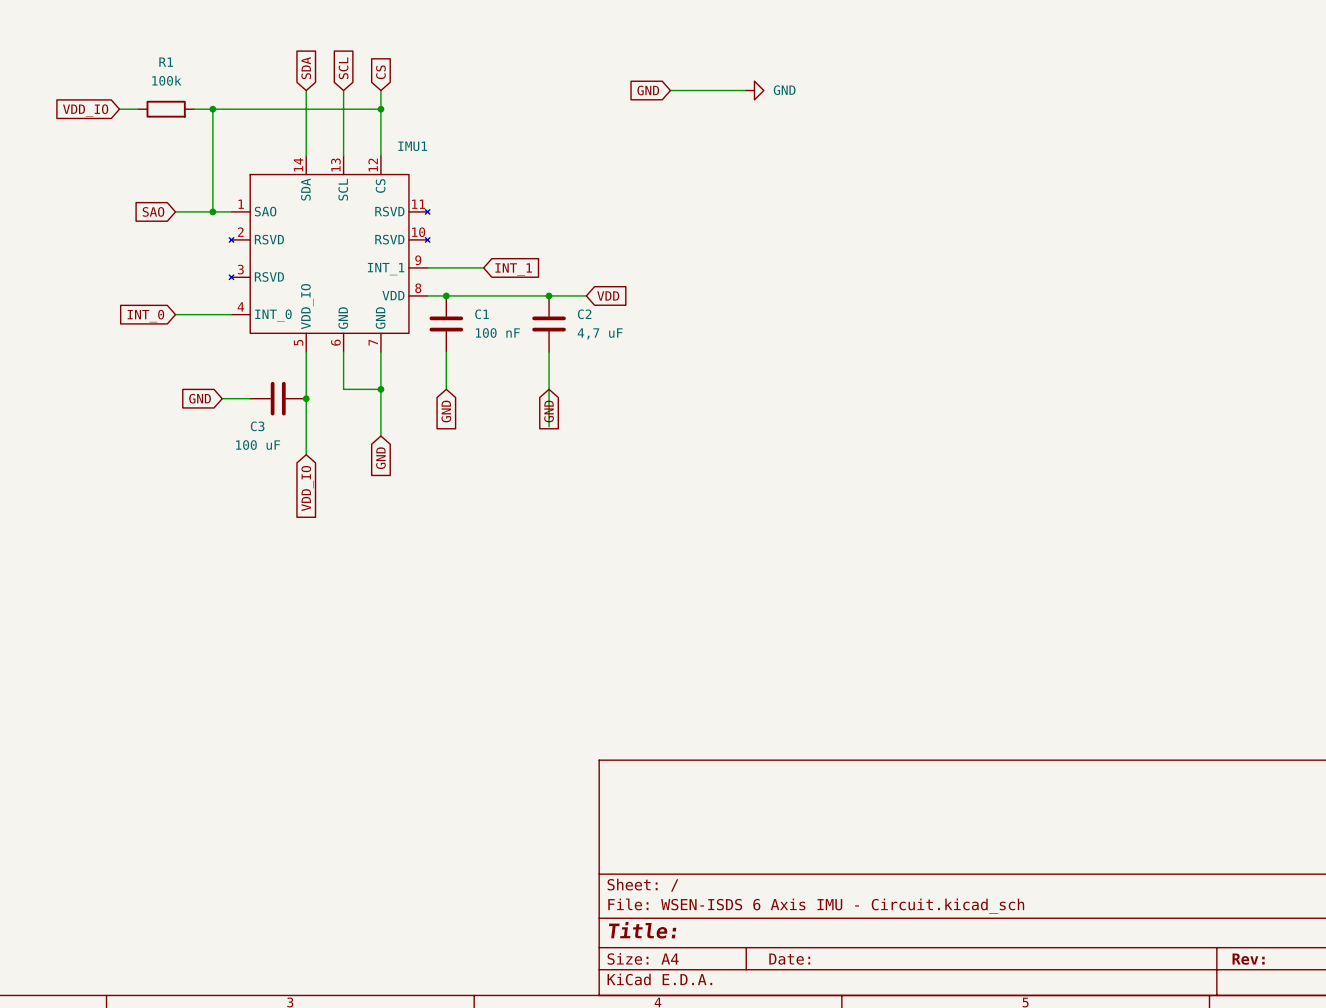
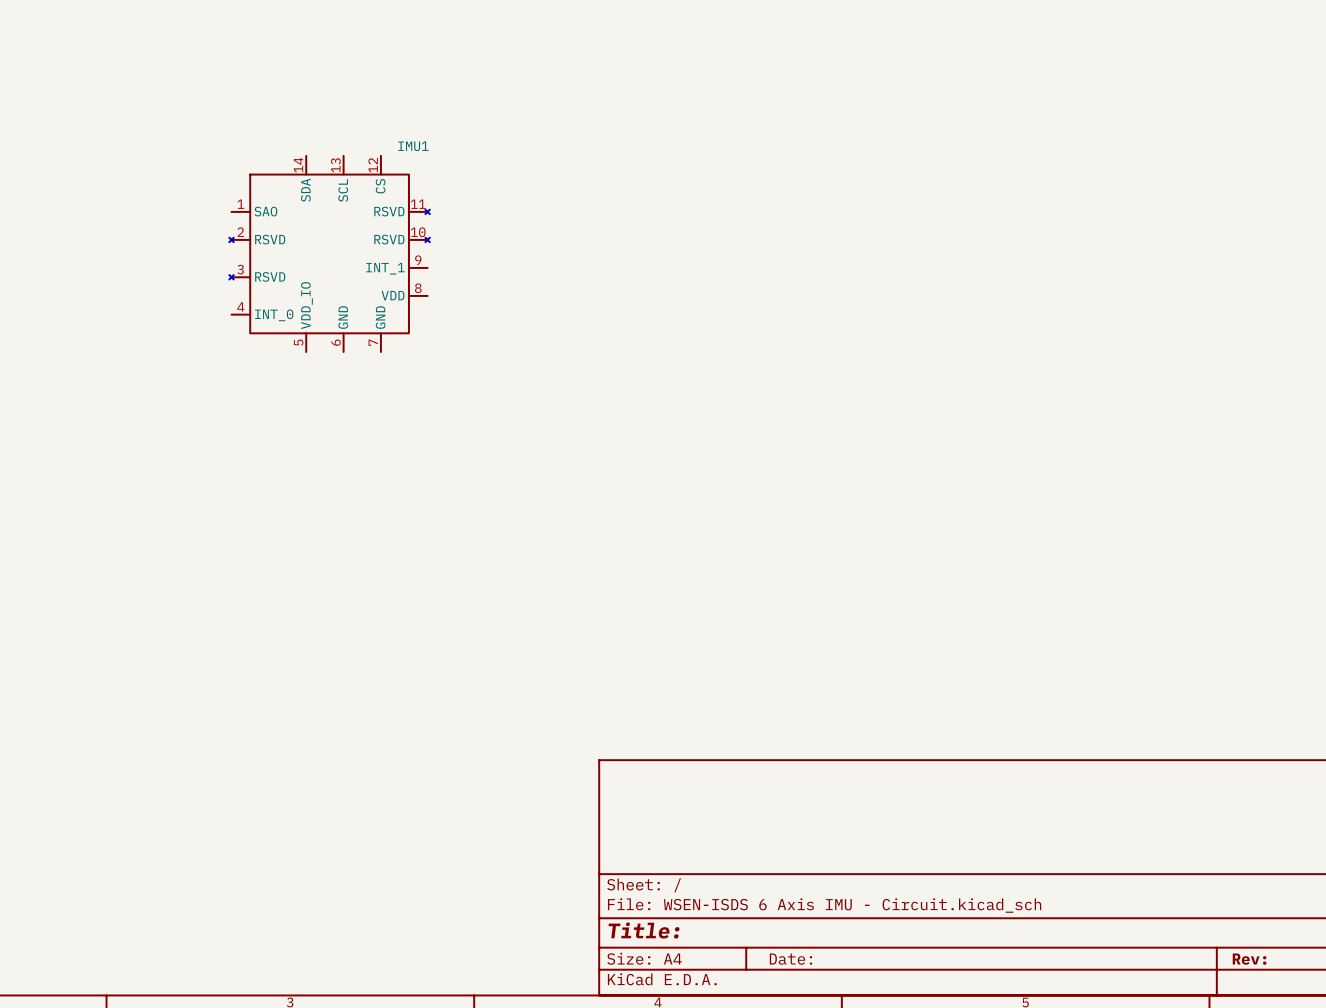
global label: SDA (306, 68) -> none
global label: SCL (343, 68) -> none
global label: CS (380, 72) -> none
wire: (306, 90) (306, 155) -> none
wire: (343, 90) (343, 155) -> none
wire: (380, 90) (380, 155) -> none
global label: GND (648, 90) -> none
wire: (670, 90) (745, 90) -> none
power symbol: GND (754, 90) -> none
wire: (119, 109) (138, 109) -> none
R1: 100k (166, 109) -> none
wire: (194, 109) (380, 109) -> none
wire: (212, 109) (212, 211) -> none
junction: (212, 109) -> none
junction: (380, 109) -> none
global label: VDD_IO (85, 110) -> none
global label: SAO (153, 211) -> none
wire: (175, 211) (231, 211) -> none
junction: (212, 211) -> none
wire: (427, 267) (483, 267) -> none
global label: INT_1 (513, 269) -> none
wire: (427, 295) (586, 295) -> none
junction: (446, 295) -> none
junction: (549, 295) -> none
global label: VDD (608, 295) -> none
wire: (175, 314) (231, 314) -> none
global label: INT_0 (145, 316) -> none
C1: 100 nF (446, 323) -> none
C2: 4,7 uF (549, 323) -> none
wire: (306, 351) (306, 454) -> none
wire: (343, 351) (343, 389) (380, 389) -> none
wire: (380, 351) (380, 436) -> none
wire: (446, 351) (446, 389) -> none
wire: (549, 351) (549, 426) -> none
junction: (380, 389) -> none
global label: GND (200, 398) -> none
wire: (222, 398) (250, 398) -> none
C3: 100 uF (278, 398) -> none
junction: (306, 398) -> none
global label: GND (446, 411) -> none
global label: GND (549, 411) -> none
global label: GND (380, 458) -> none
global label: VDD_IO (307, 488) -> none

